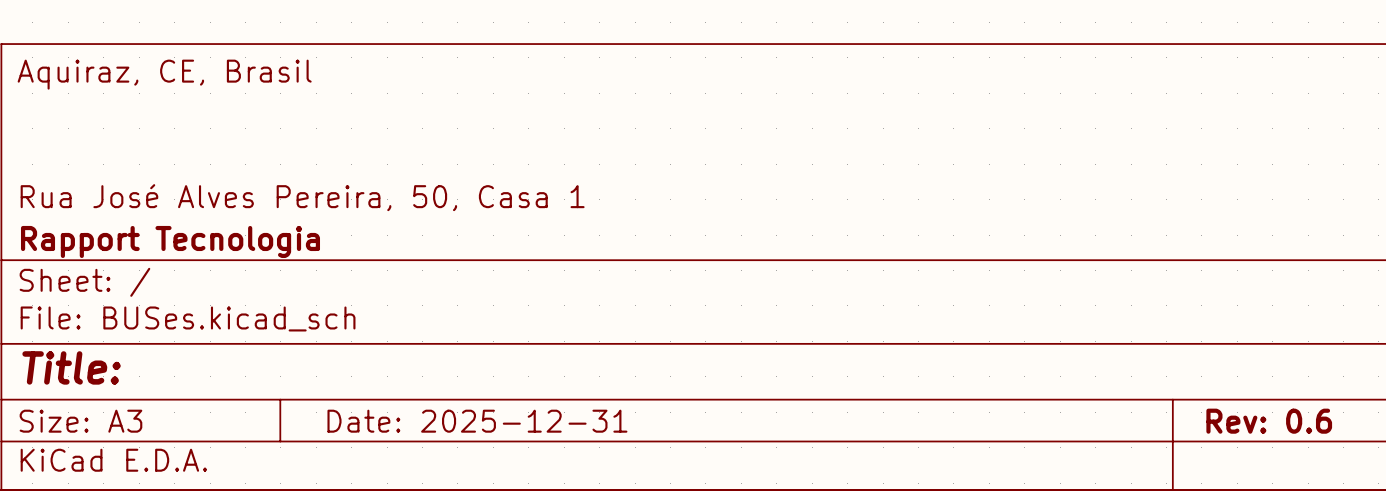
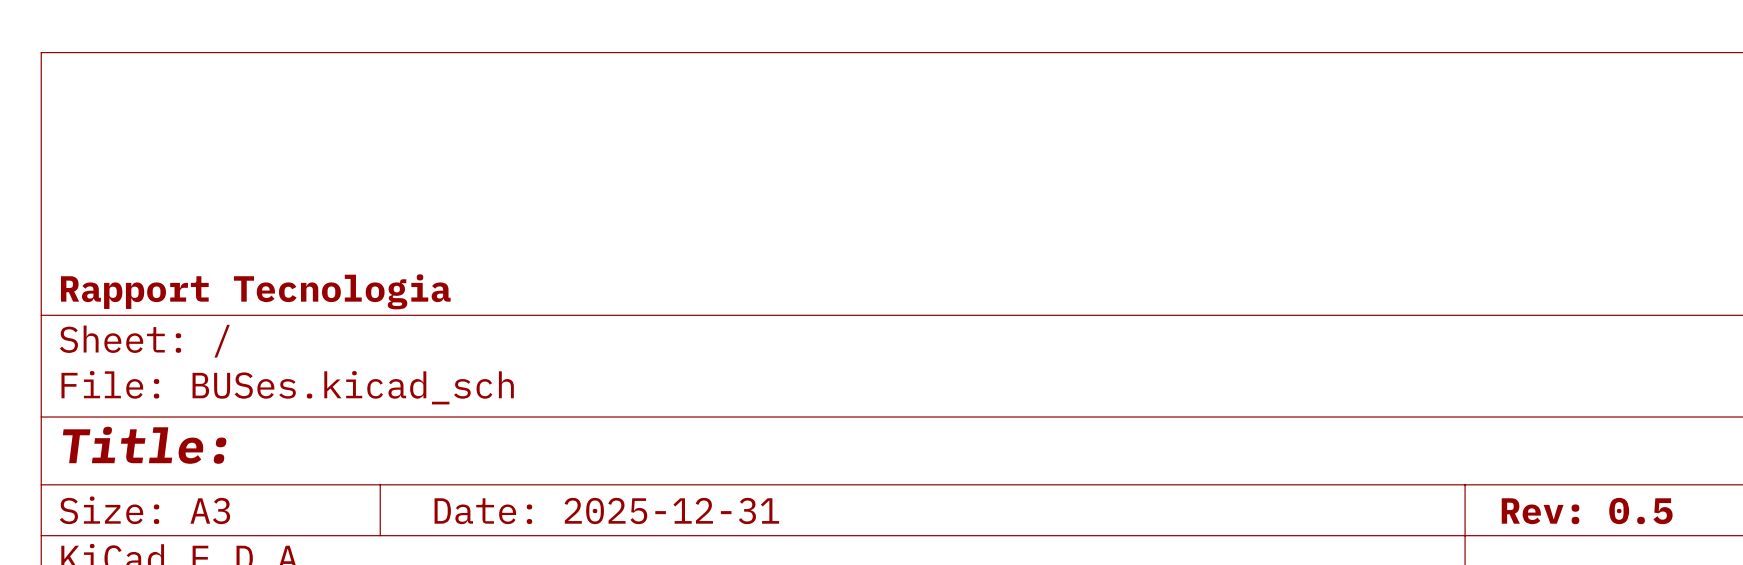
title block: Aquiraz, CE, Brasil (164, 74) -> none
title block: Rua José Alves Pereira, 50, Casa 1 (302, 197) -> none
title block: Rev: 0.6 (1269, 421) -> Rev: 0.5 (1587, 510)

